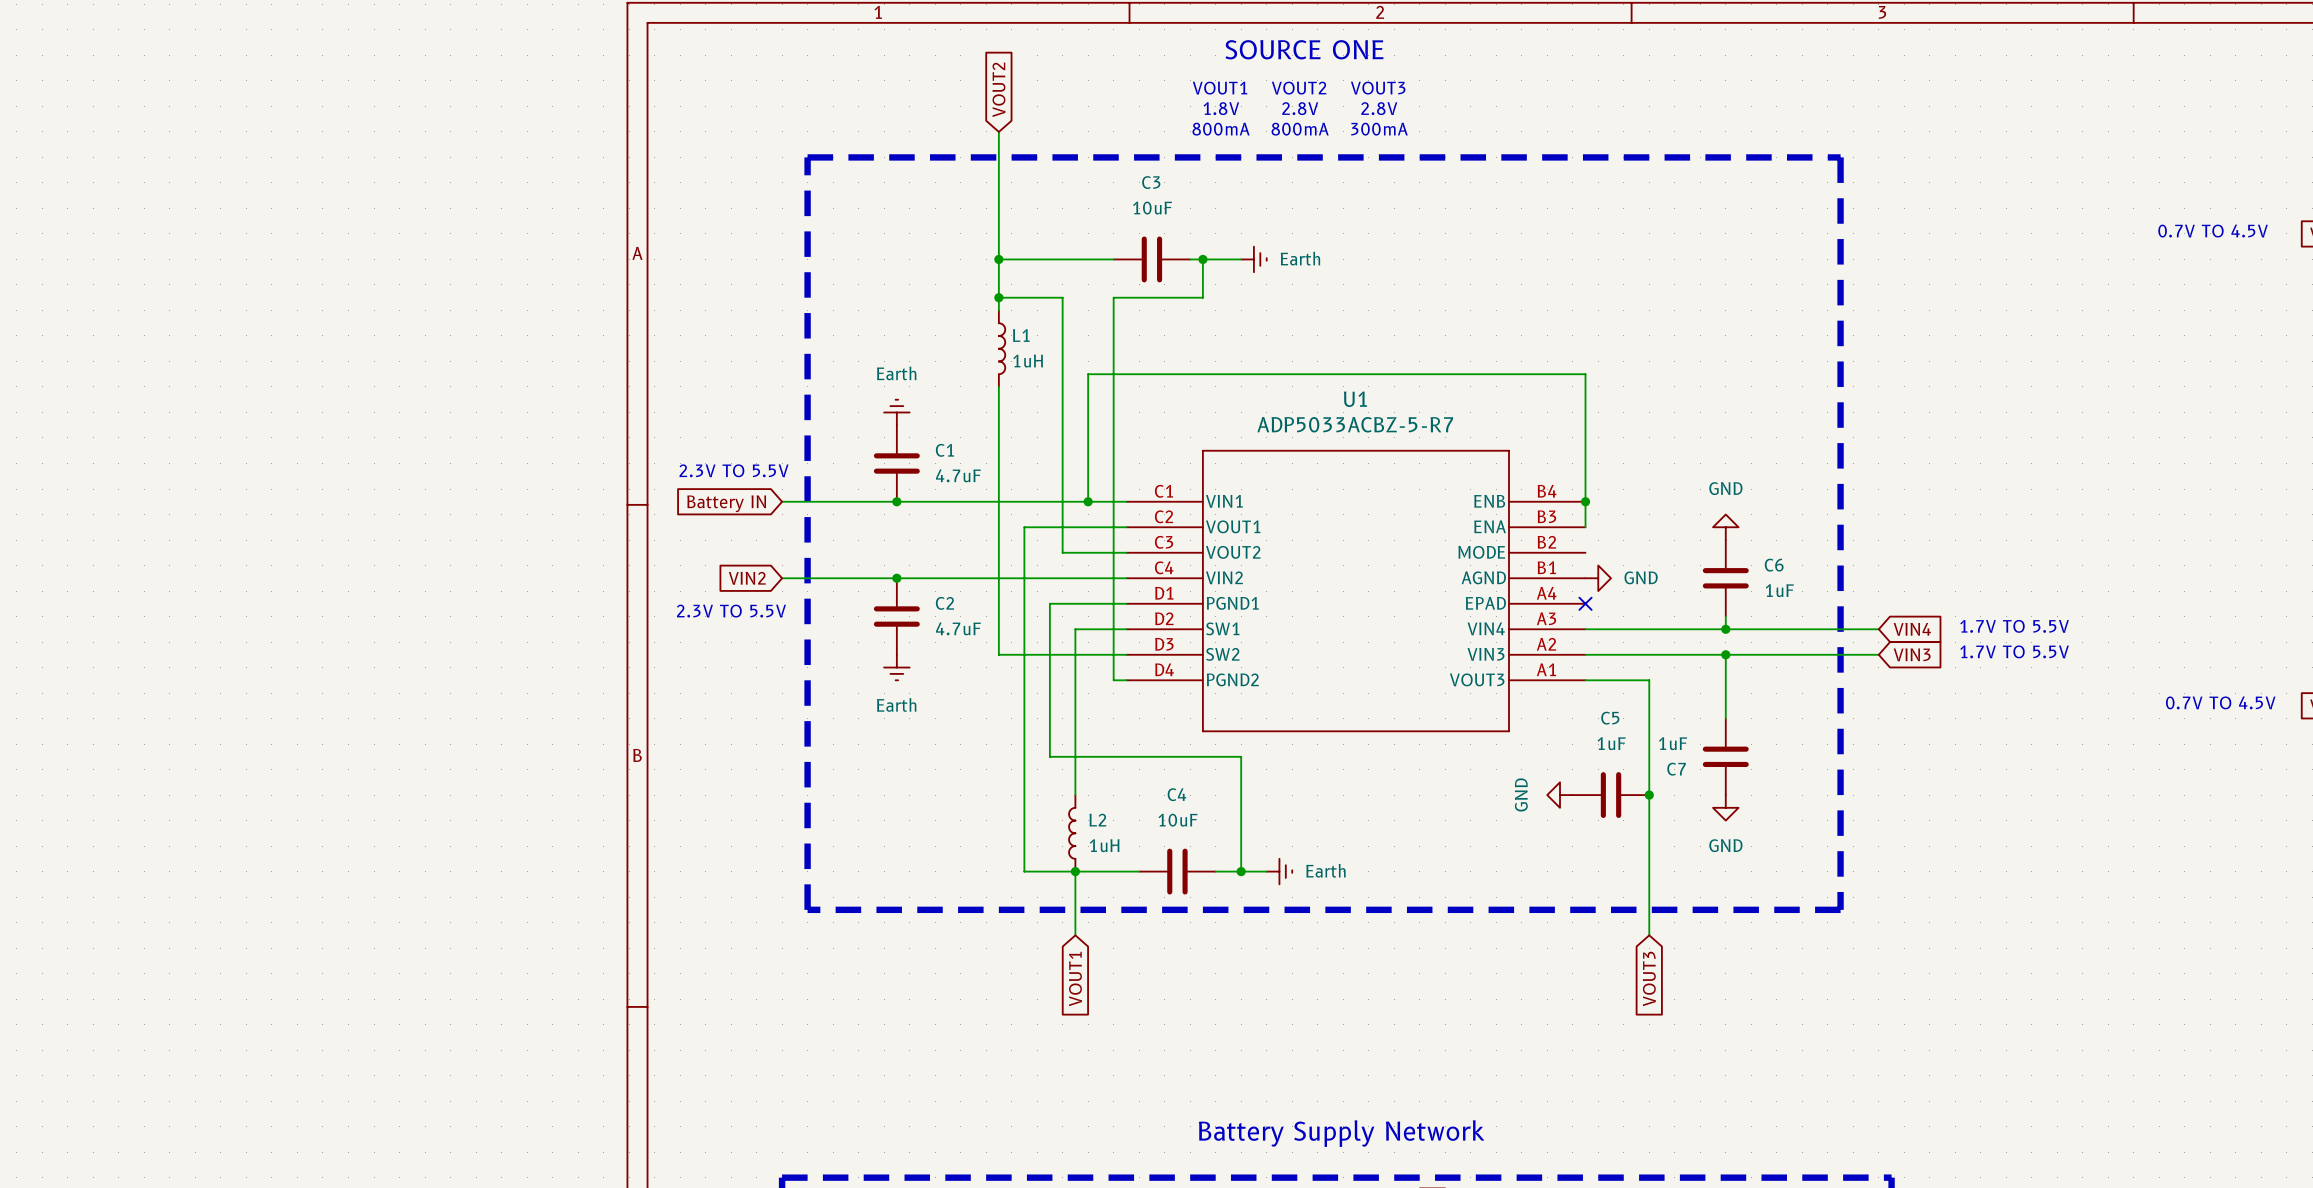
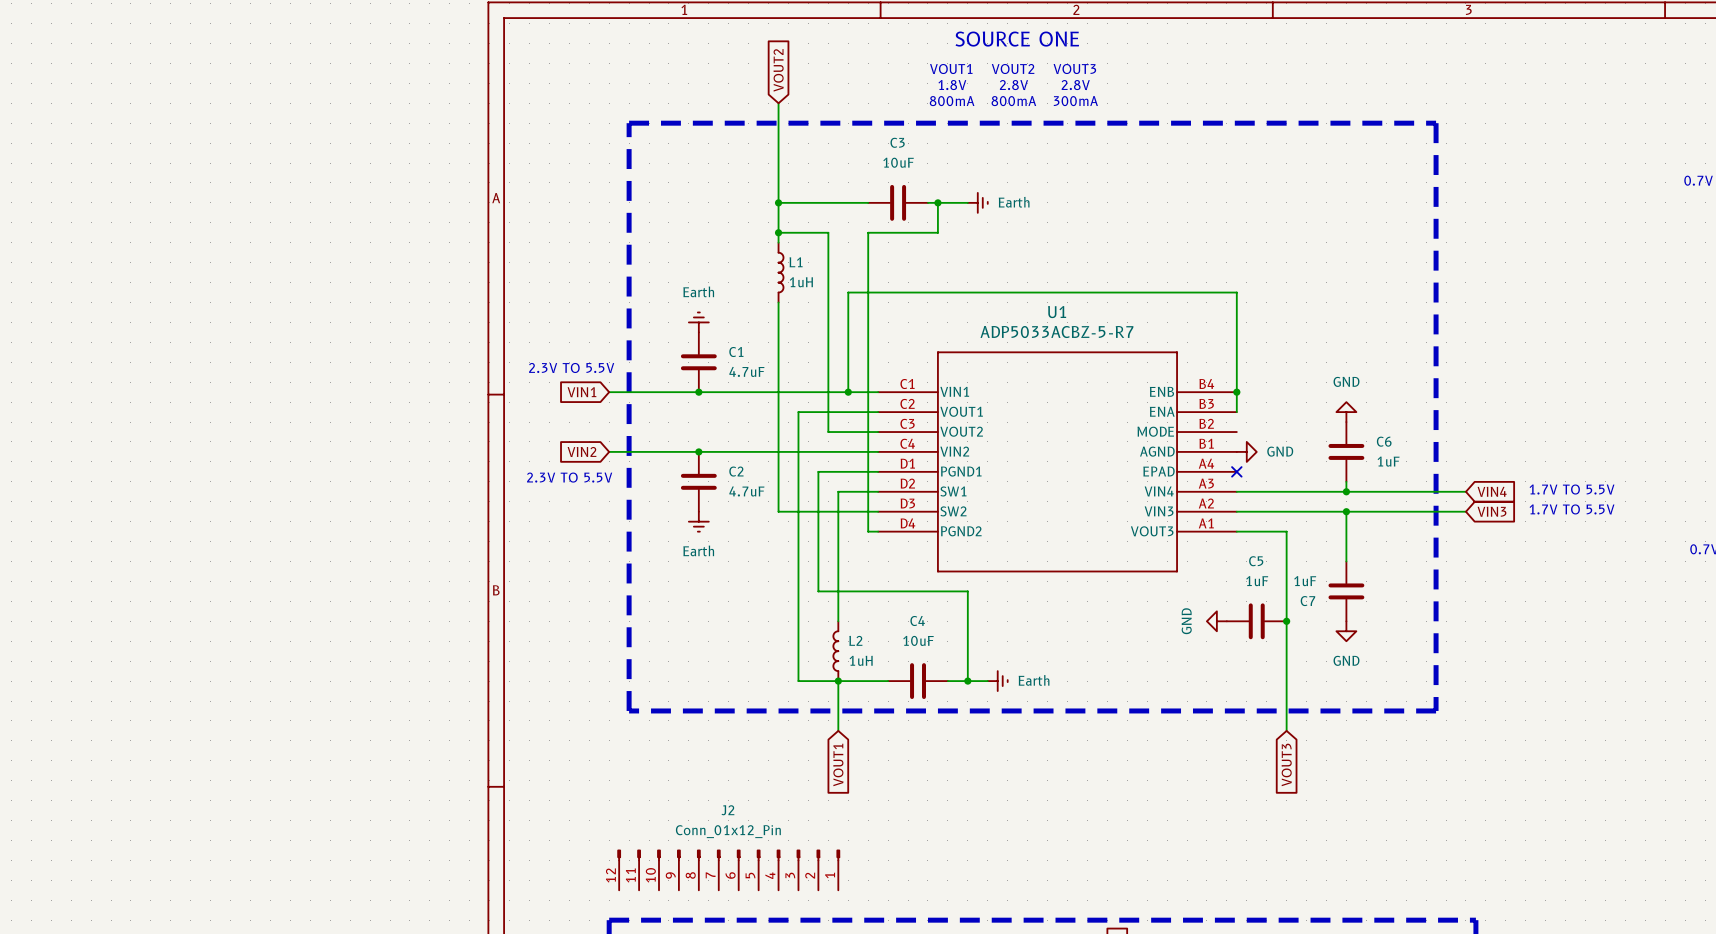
global label: Battery IN (726, 503) -> VIN1 (581, 392)
J2: none -> Conn_01x12_Pin (728, 870)
text: Battery Supply Network (1341, 1133) -> none

